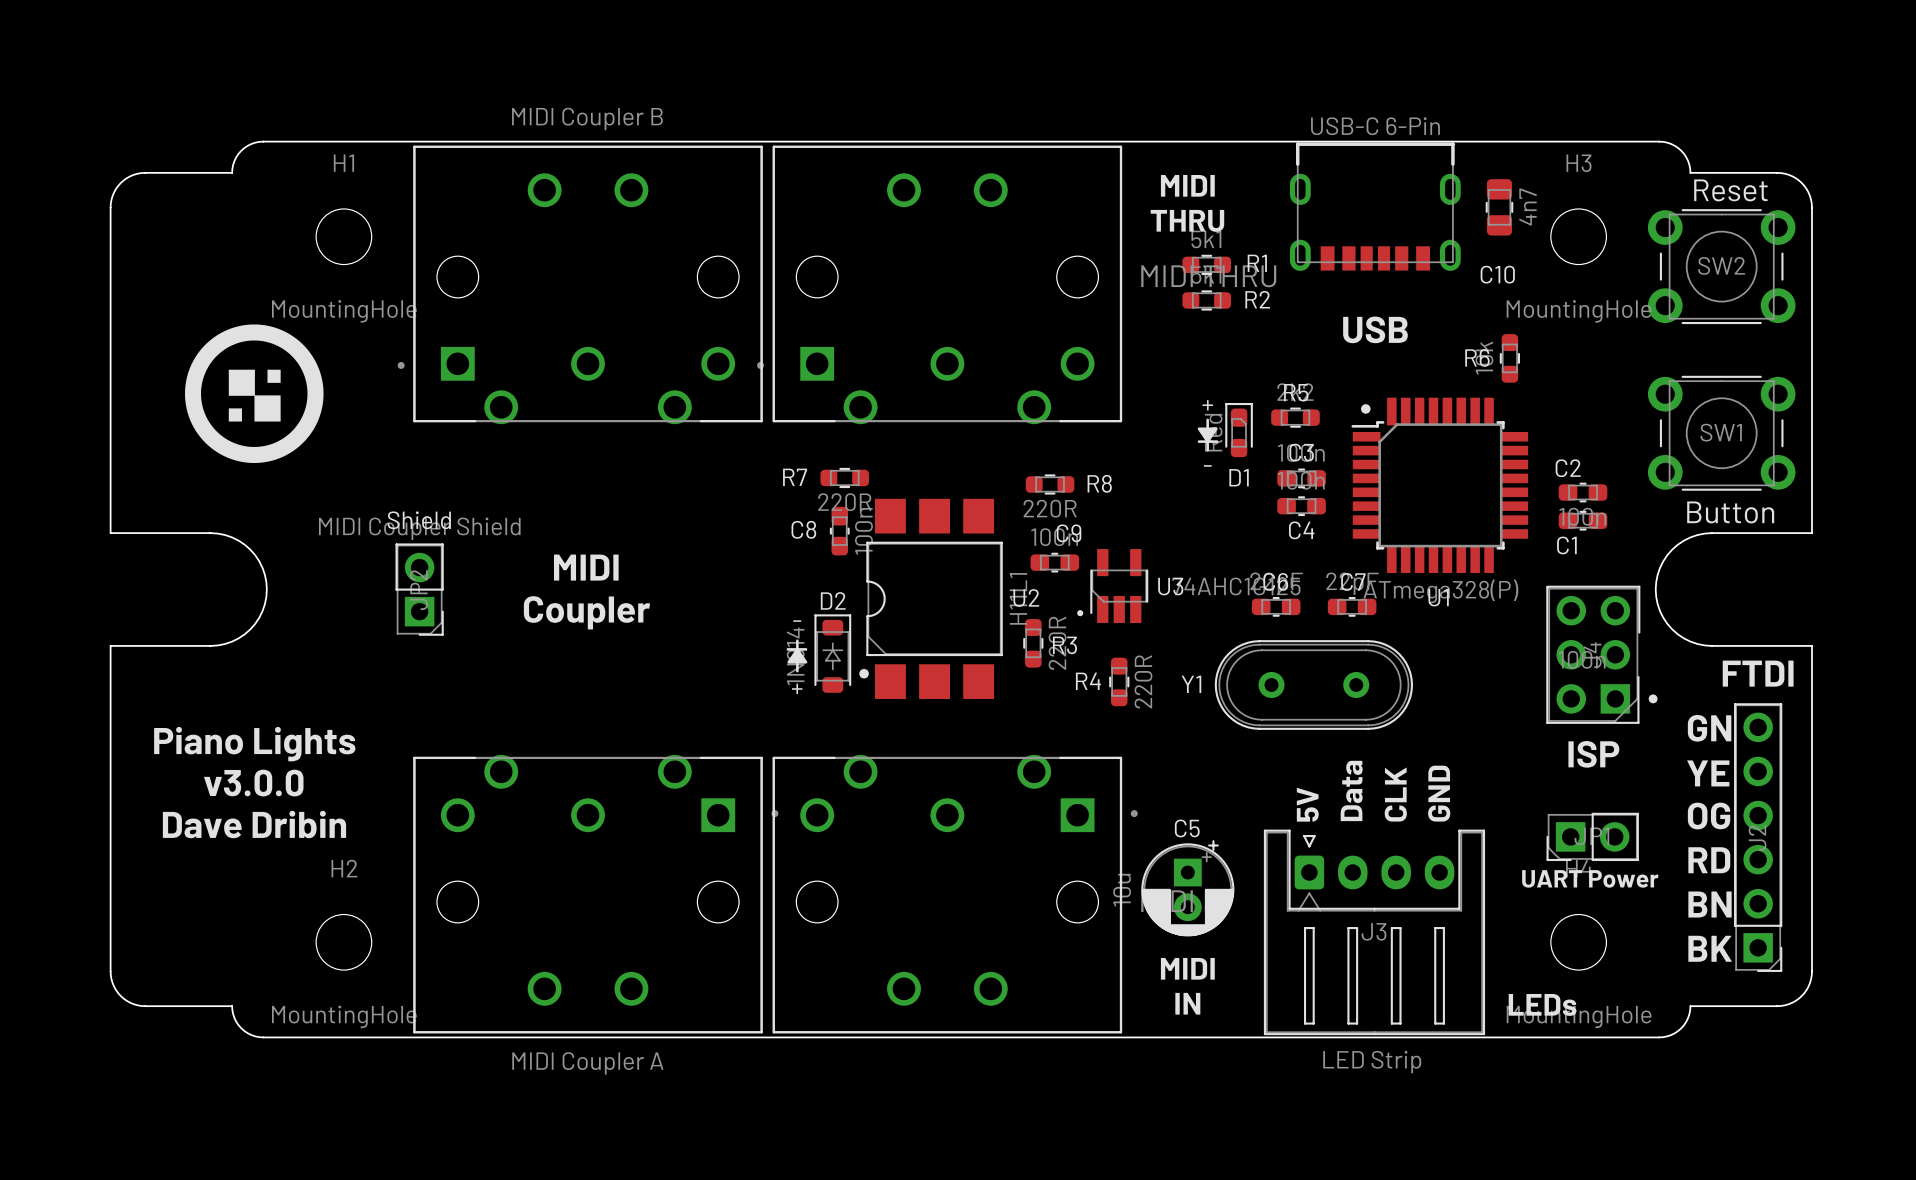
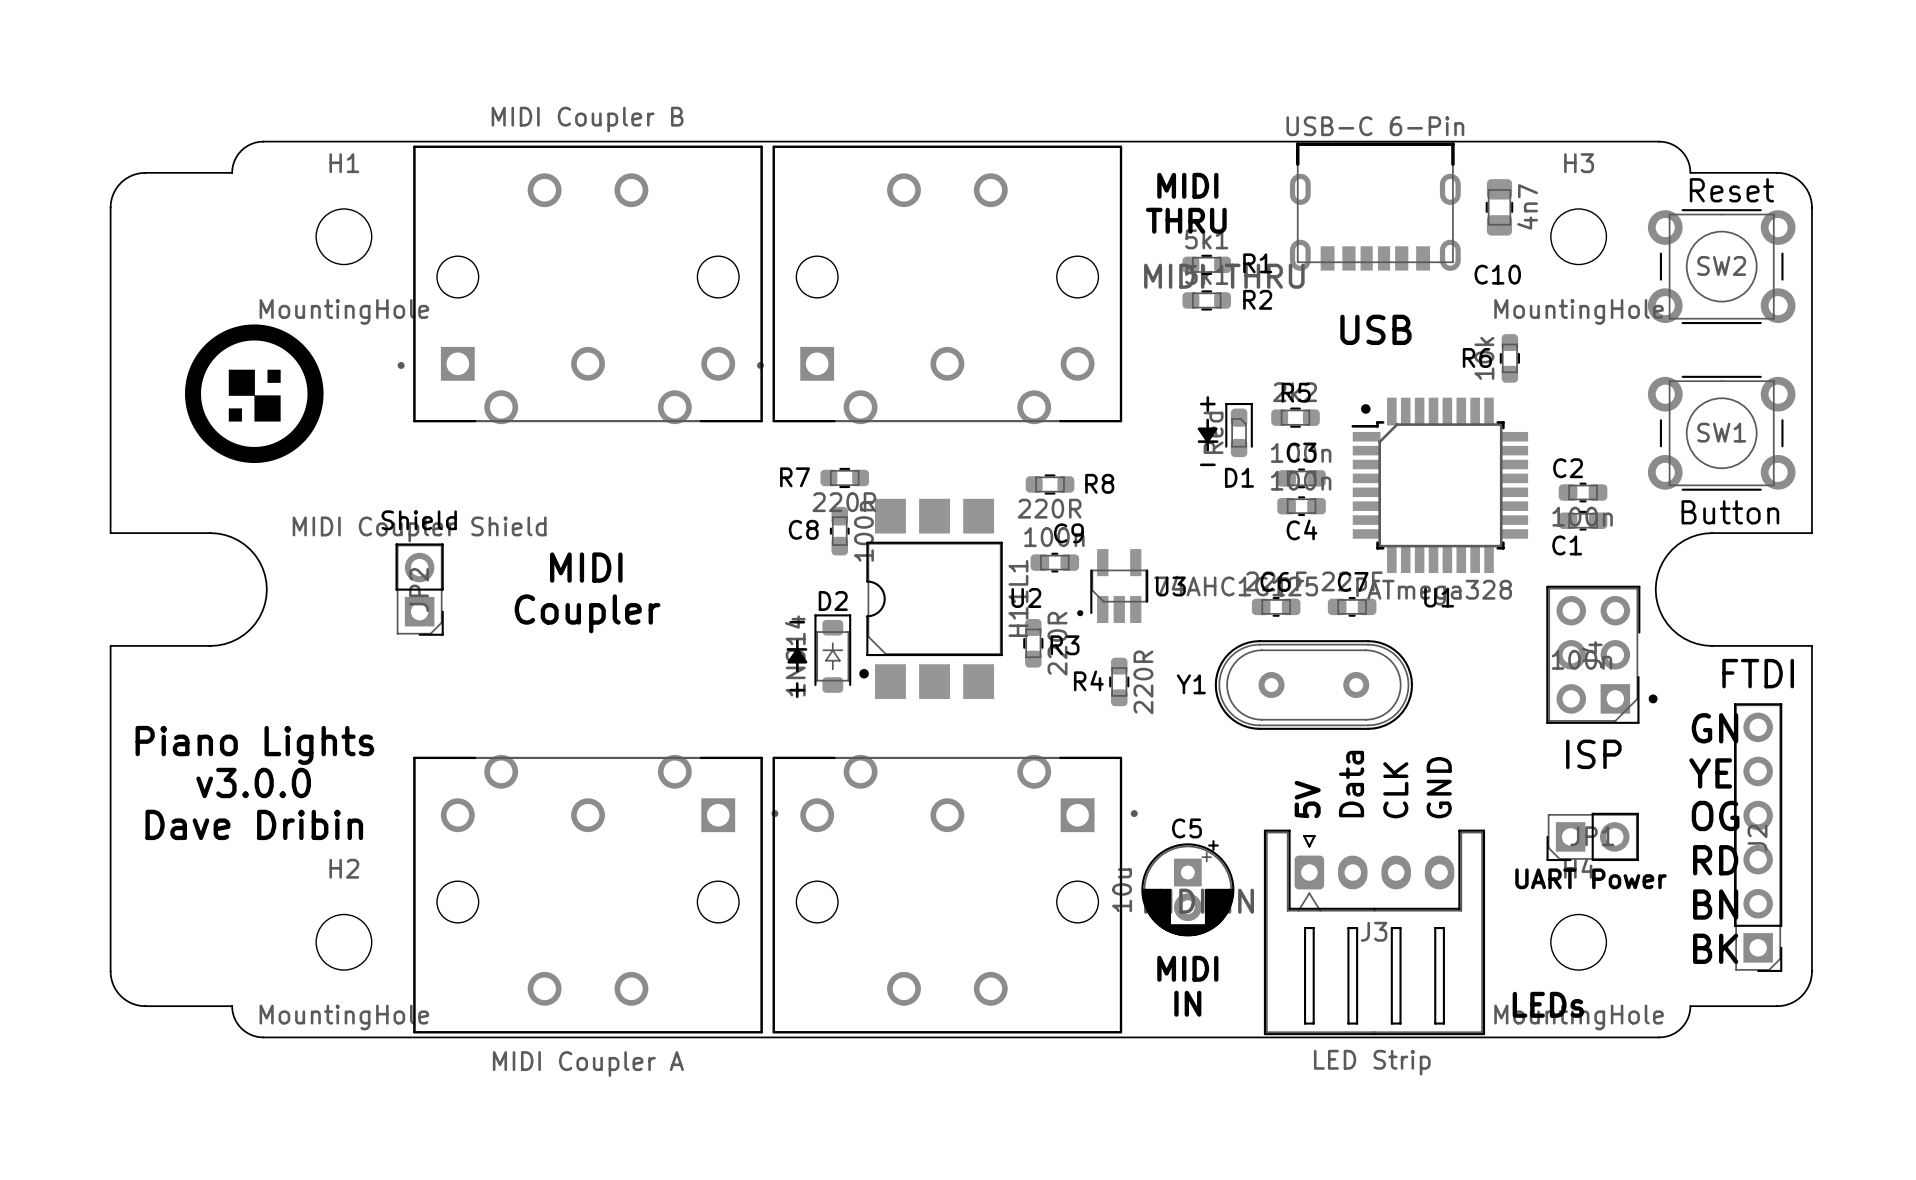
U1 value: ATmega328(P) (1440, 591) -> ATmega328 (1439, 592)

